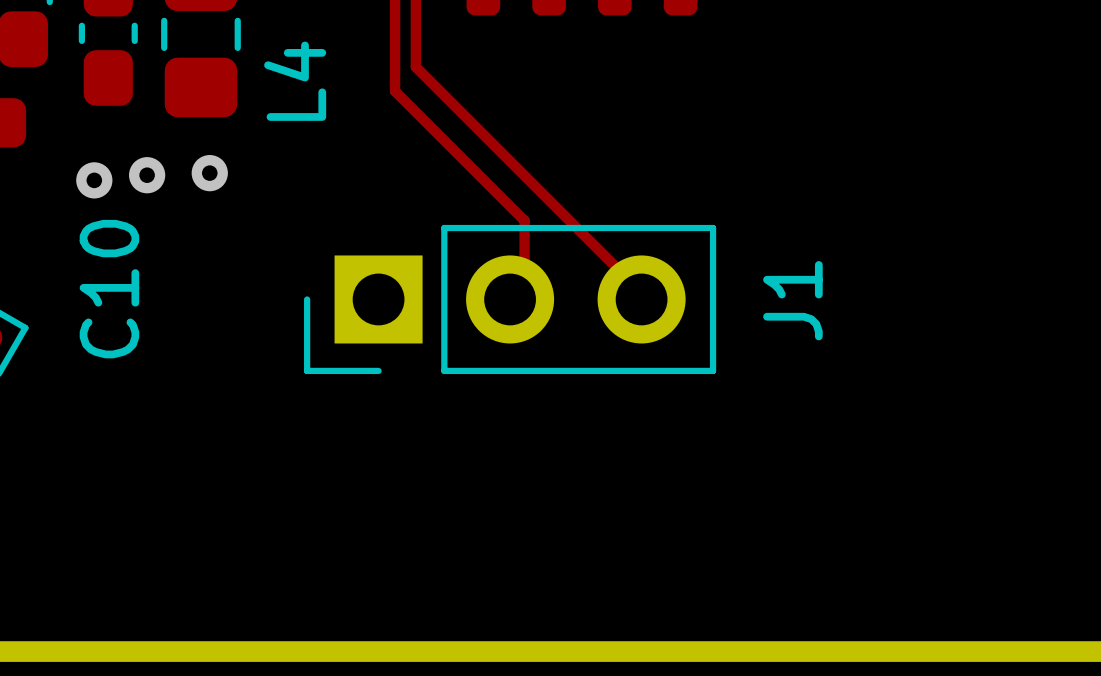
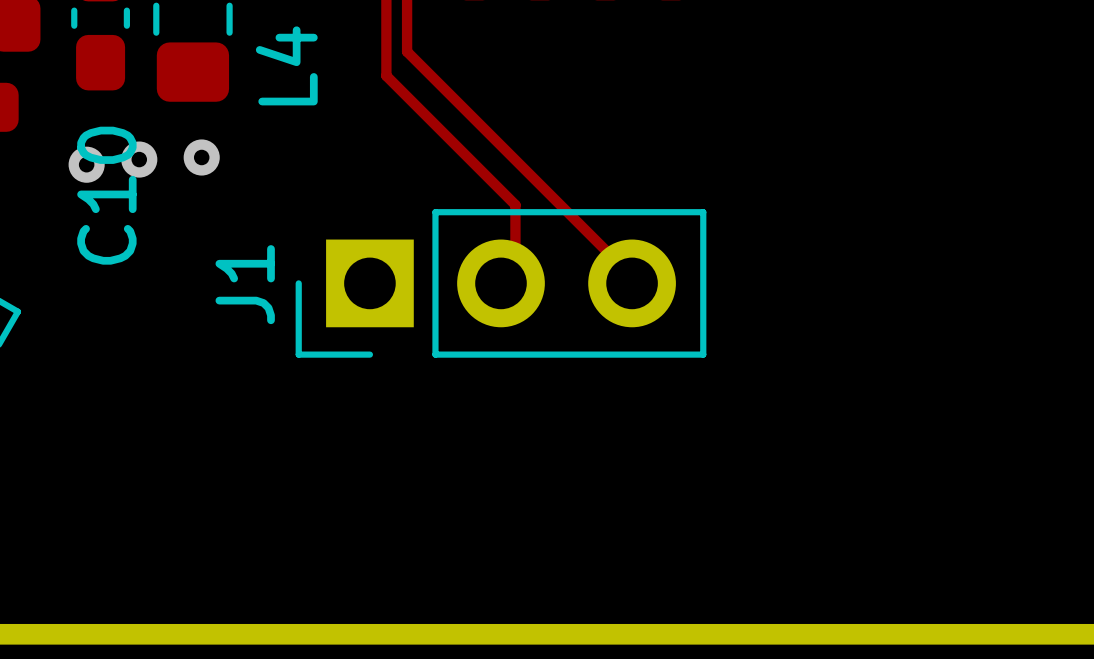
C10 name position: C10 (109, 289) -> C10 (106, 195)
J1 name position: J1 (792, 300) -> J1 (245, 284)

